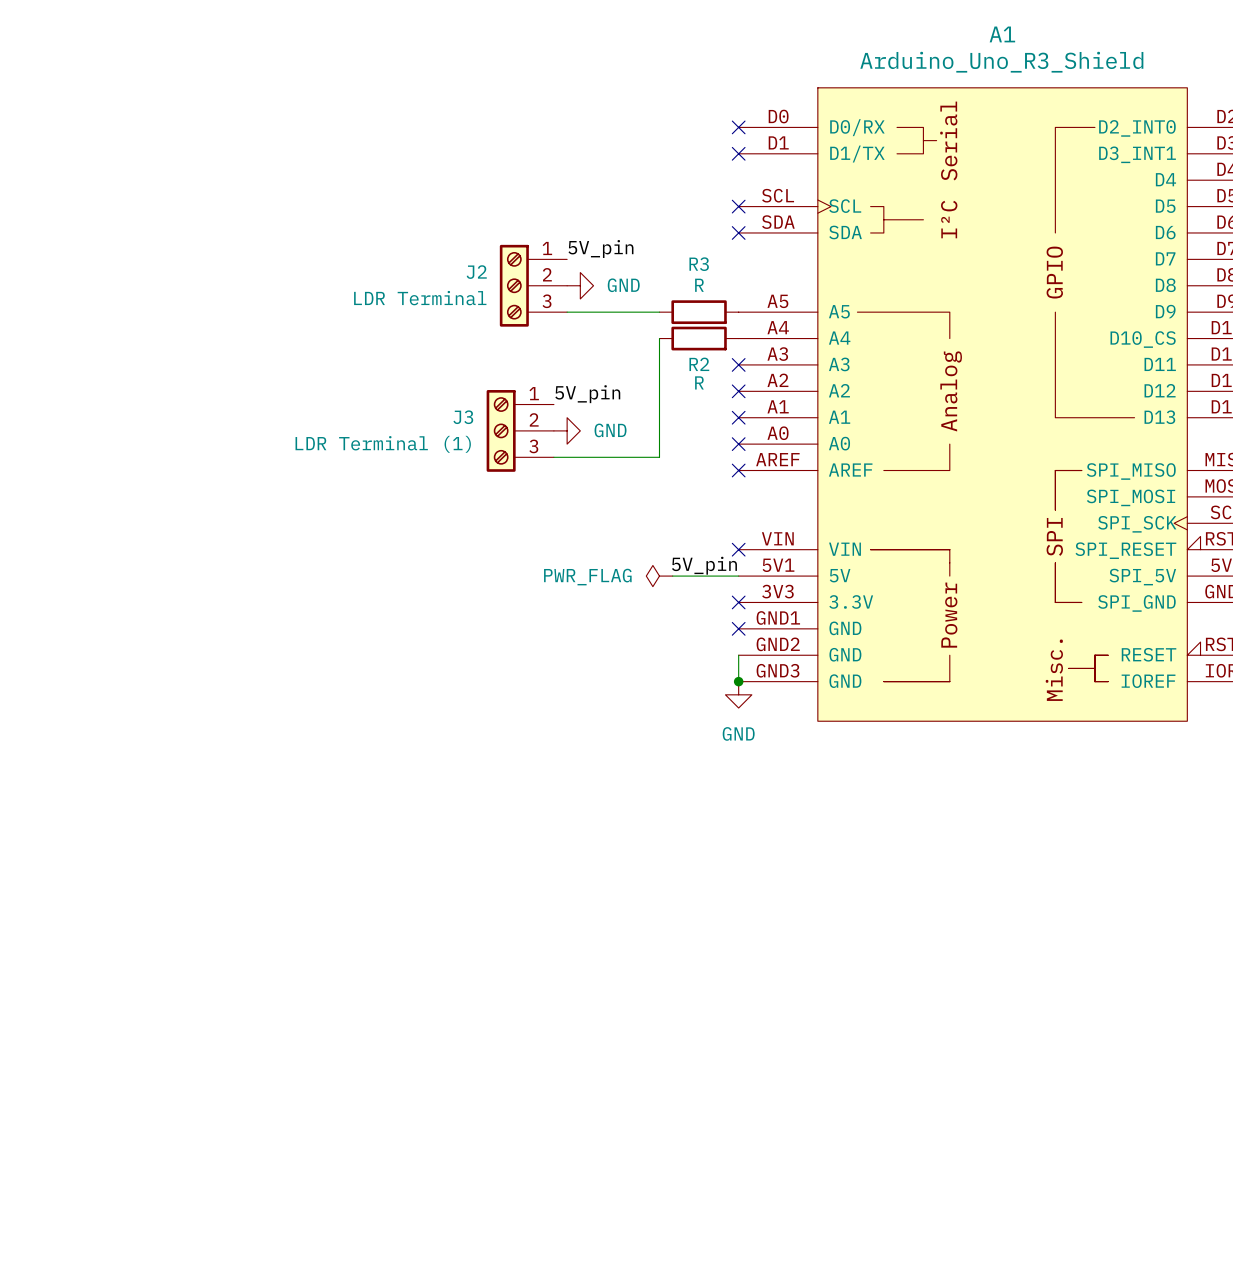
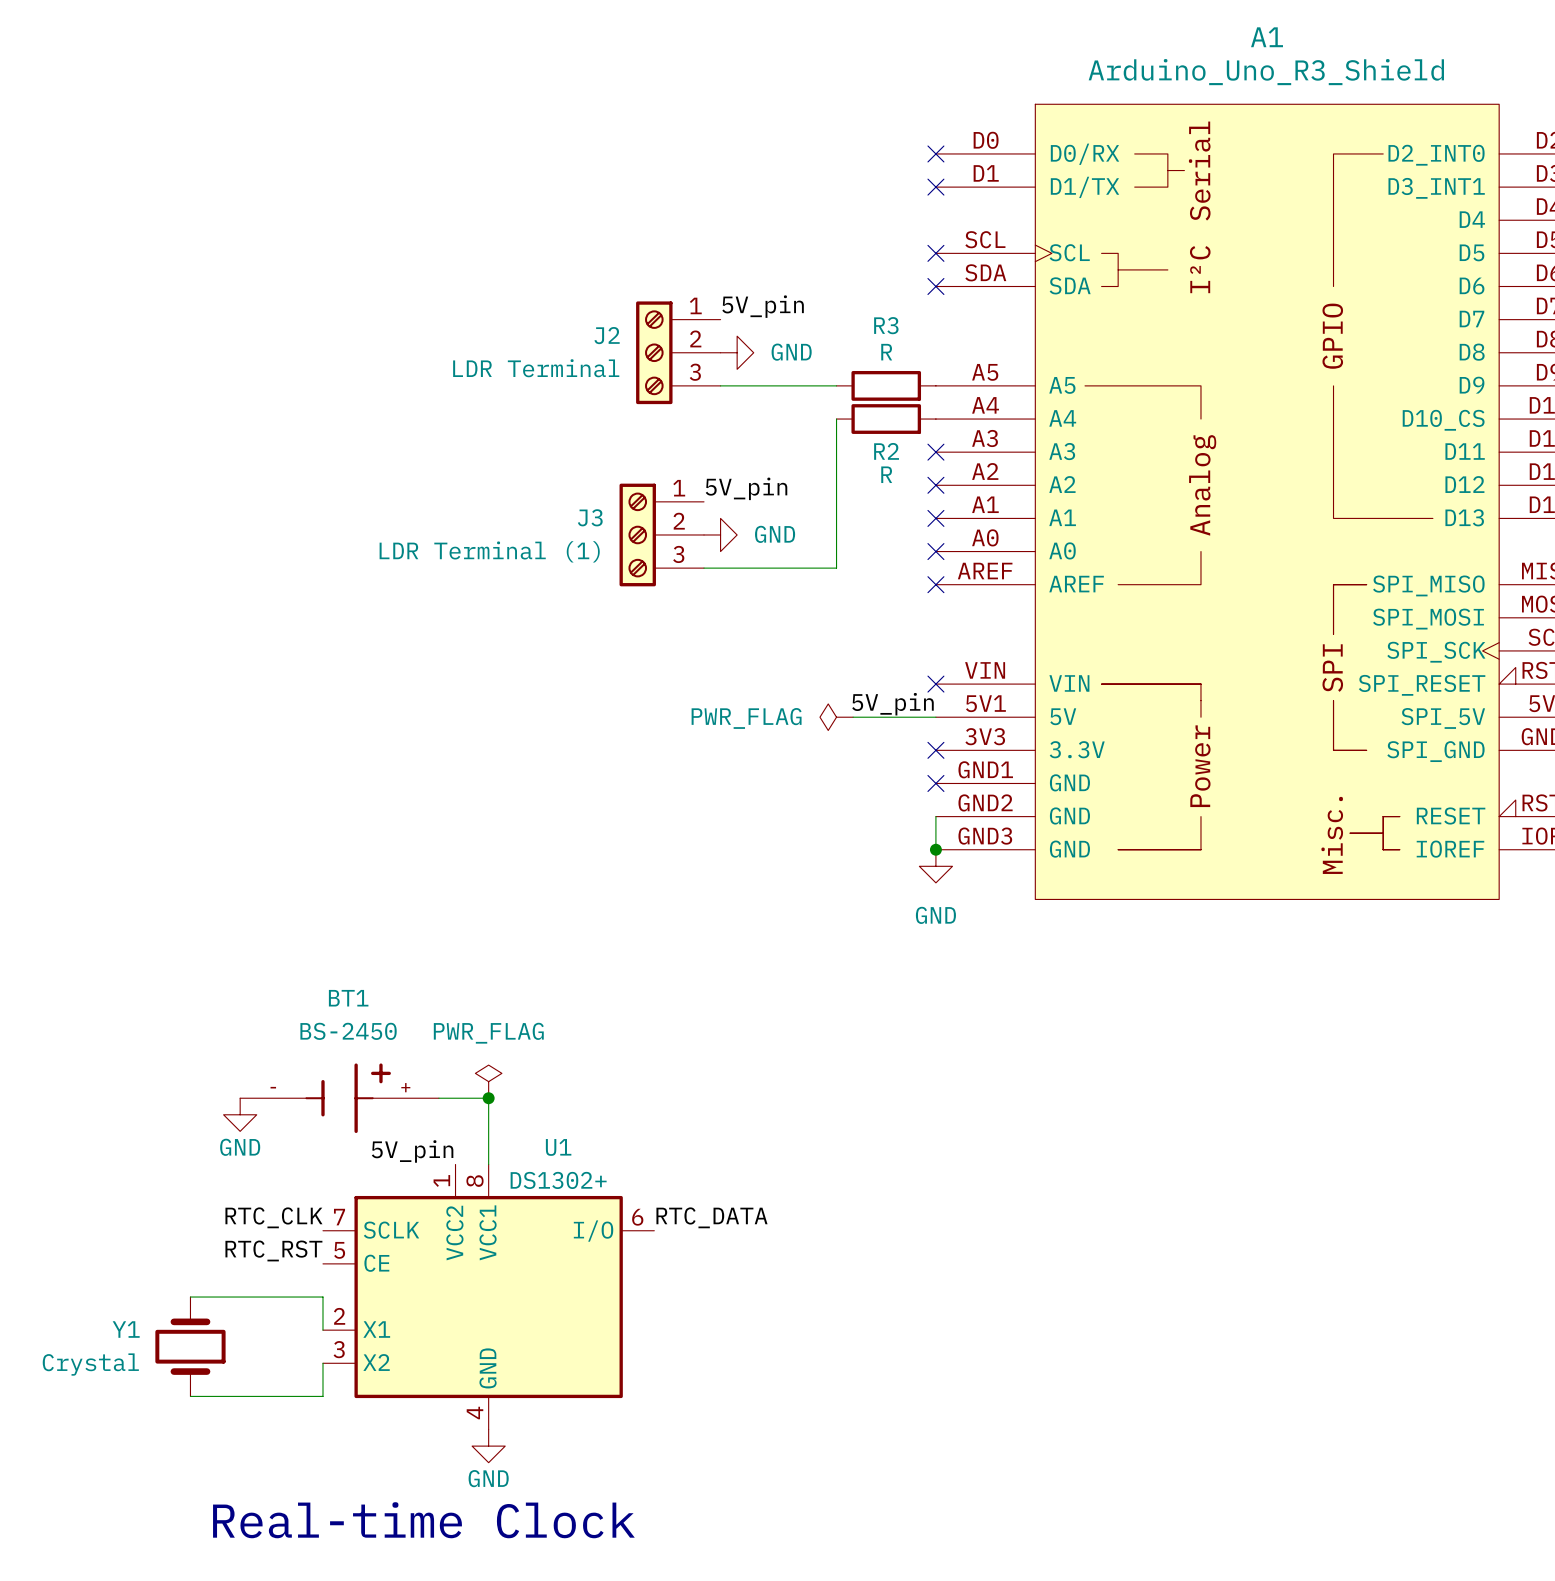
power symbol: none -> PWR_FLAG (488, 1081)
BT1: none -> BS-2450 (339, 1098)
wire: none -> (438, 1098) (488, 1098) (488, 1164)
junction: none -> (488, 1098)
power symbol: none -> GND (240, 1114)
label: none -> 5V_pin (412, 1151)
label: none -> RTC_CLK (273, 1217)
label: none -> RTC_DATA (711, 1217)
label: none -> RTC_RST (273, 1250)
wire: none -> (190, 1297) (322, 1297) (322, 1330)
U1: none -> DS1302+ (488, 1297)
Y1: none -> Crystal (190, 1346)
wire: none -> (322, 1363) (322, 1396) (190, 1396)
power symbol: none -> GND (488, 1446)
text: none -> Real-time Clock (423, 1520)

